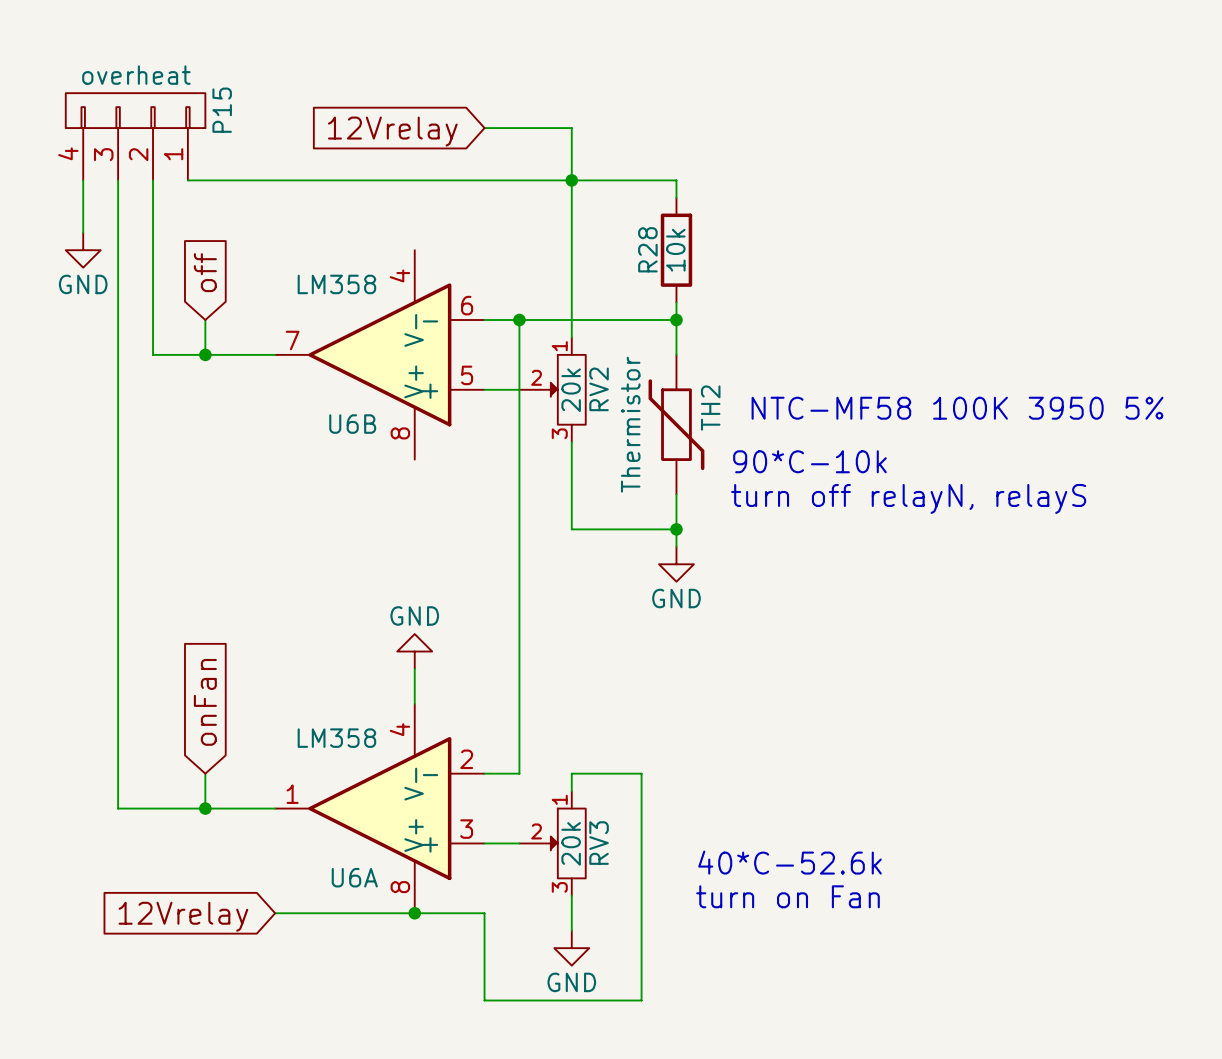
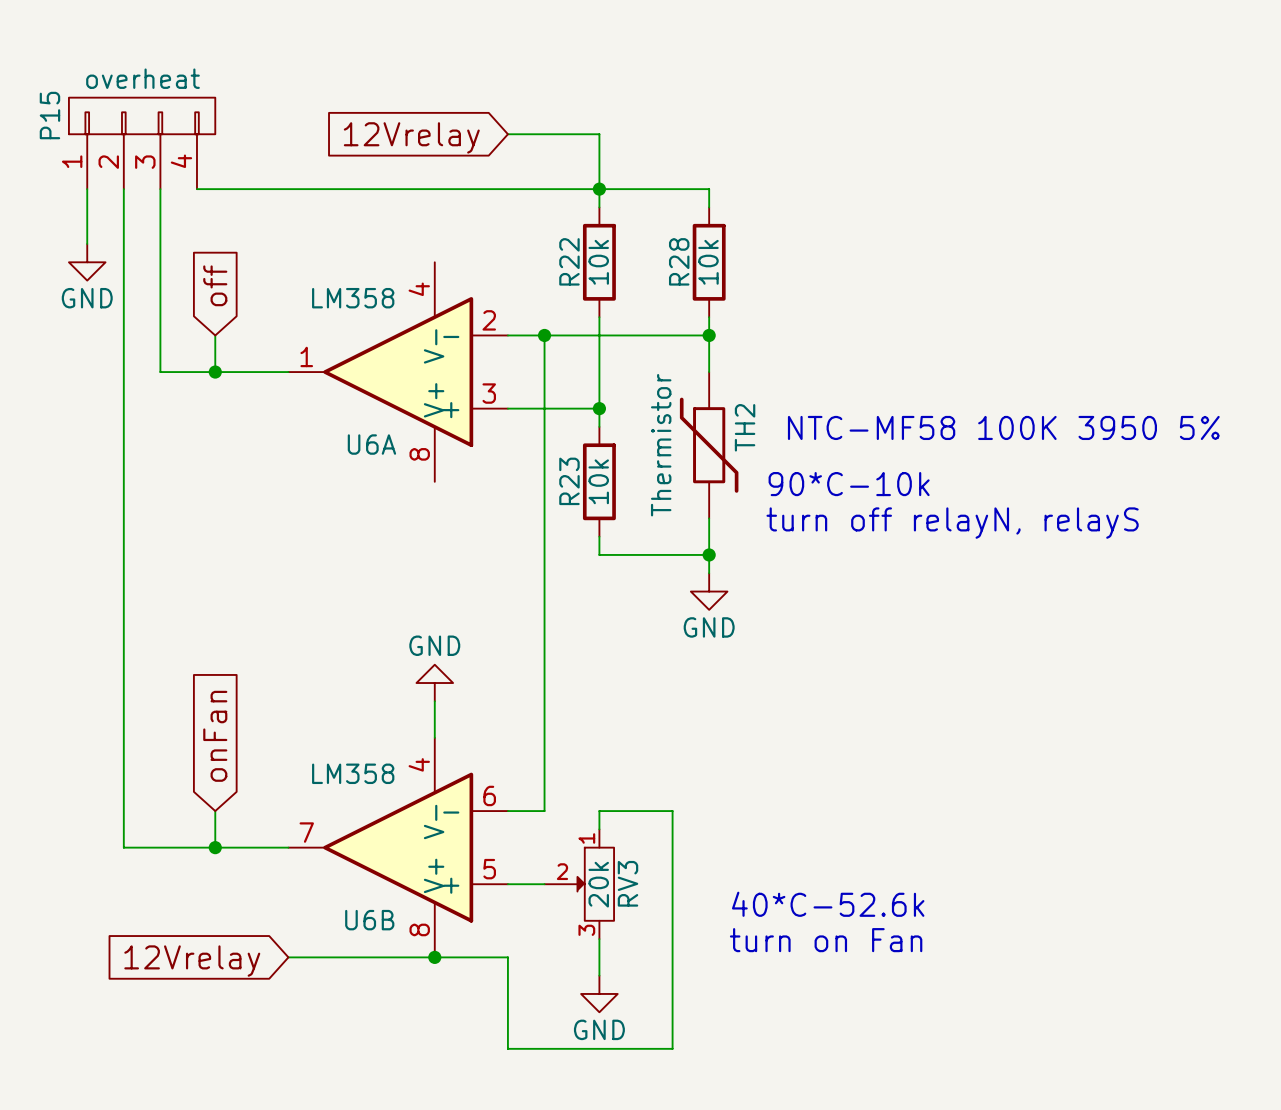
P15 flip: as is (135, 110) -> left-right (142, 115)
wire: (571, 197) (571, 302) -> none
R22: none -> 10k (599, 262)
U6B position: (379, 354) -> (398, 847)
RV2: 20k (552, 389) -> none
junction: none -> (599, 408)
wire: (571, 442) (571, 511) -> (599, 353) (599, 426)
R23: none -> 10k (599, 481)
U6A position: (379, 808) -> (398, 372)

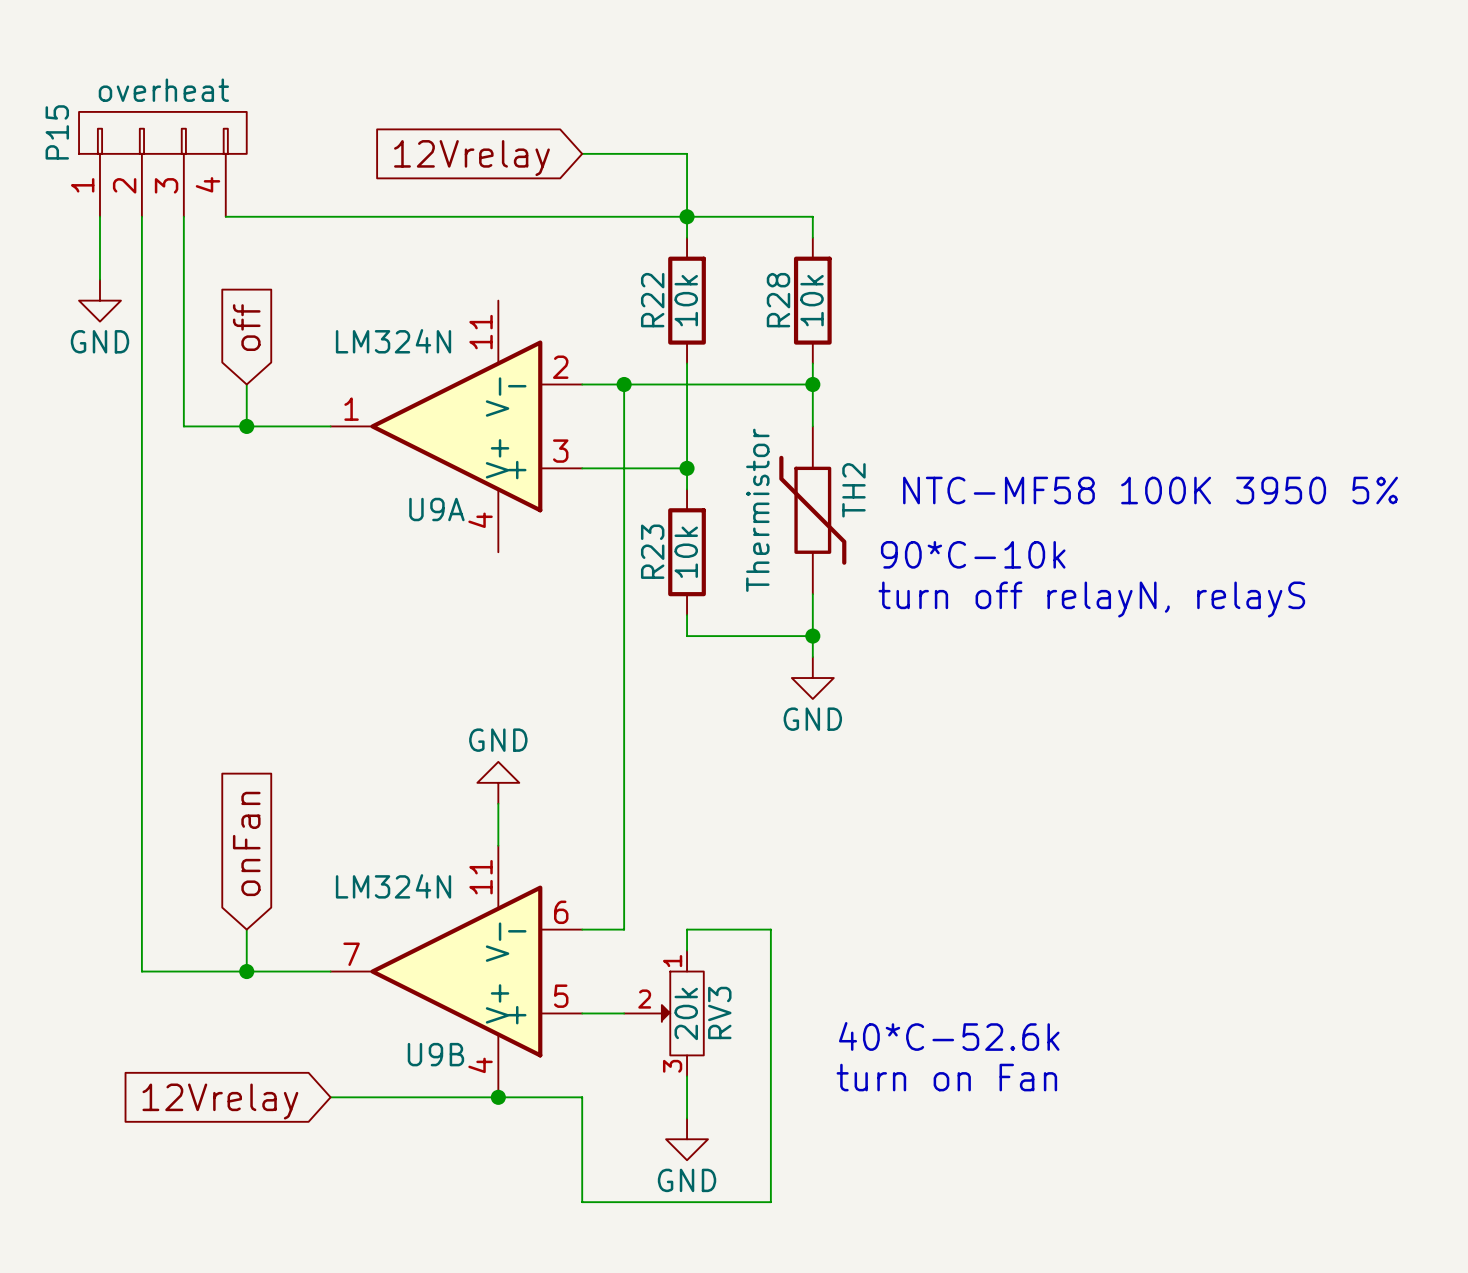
U6A pin number: 4 (419, 289) -> 11 (481, 332)
U6A value: LM358 (353, 298) -> LM324N (393, 341)
U6A name: U6A (371, 444) -> U9A (436, 509)
U6A pin number: 8 (419, 454) -> 4 (480, 520)
U6B pin number: 4 (419, 764) -> 11 (481, 877)
U6B value: LM358 (353, 773) -> LM324N (393, 886)
U6B name: U6B (369, 920) -> U9B (435, 1054)
U6B pin number: 8 (419, 929) -> 4 (480, 1065)

